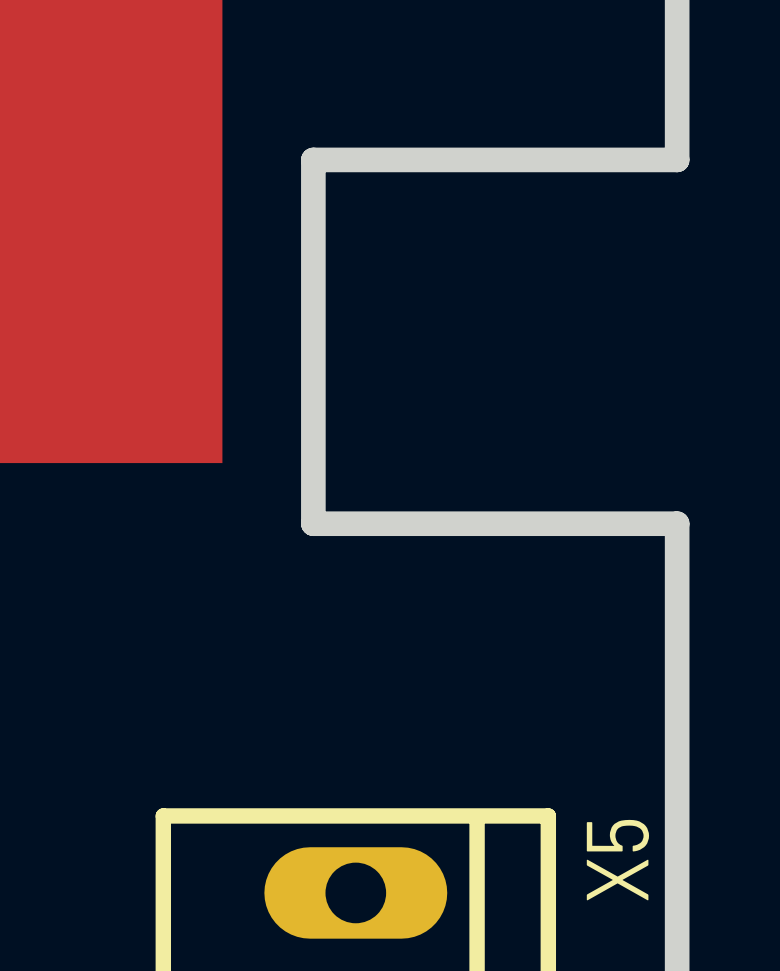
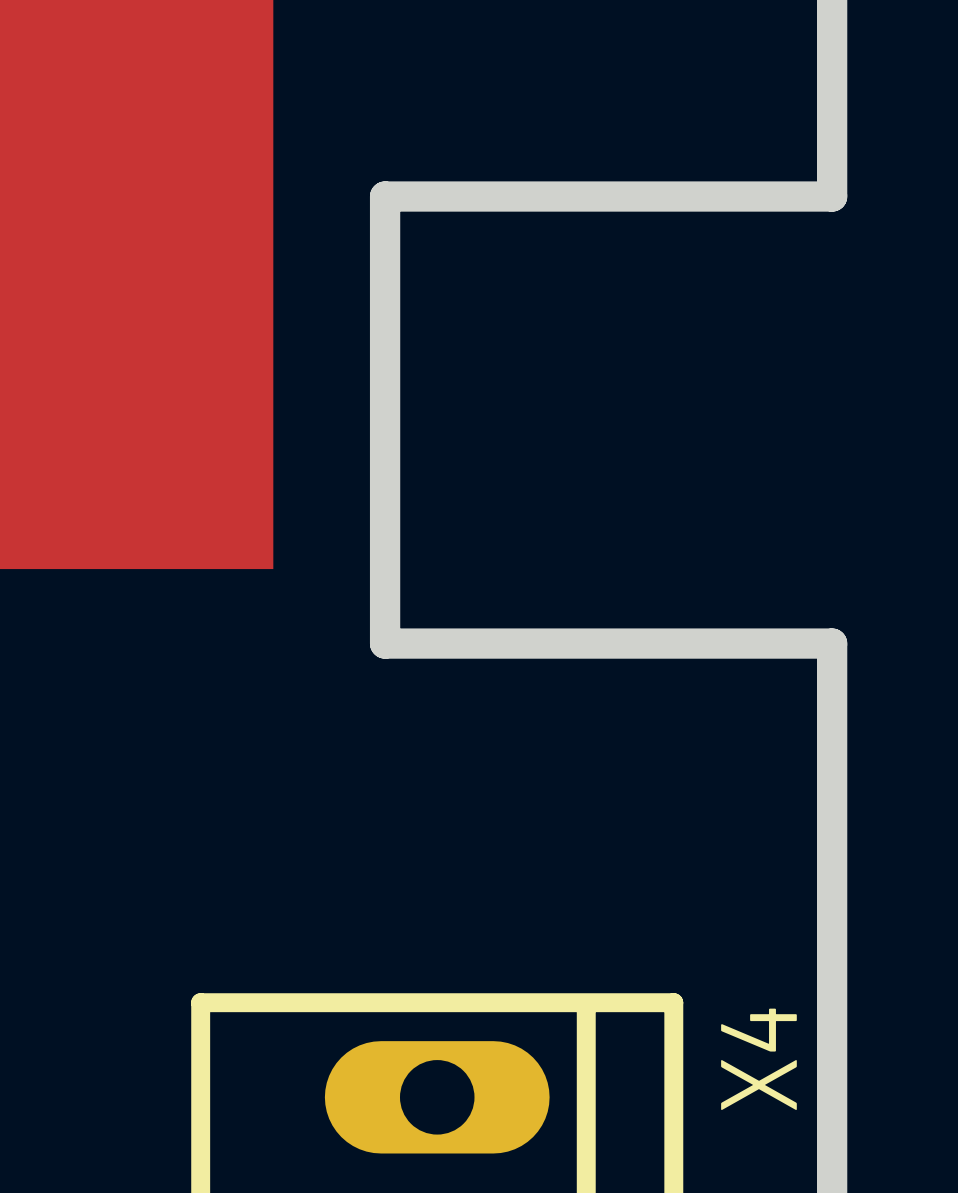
X5 name: X5 (617, 860) -> X4 (758, 1059)

